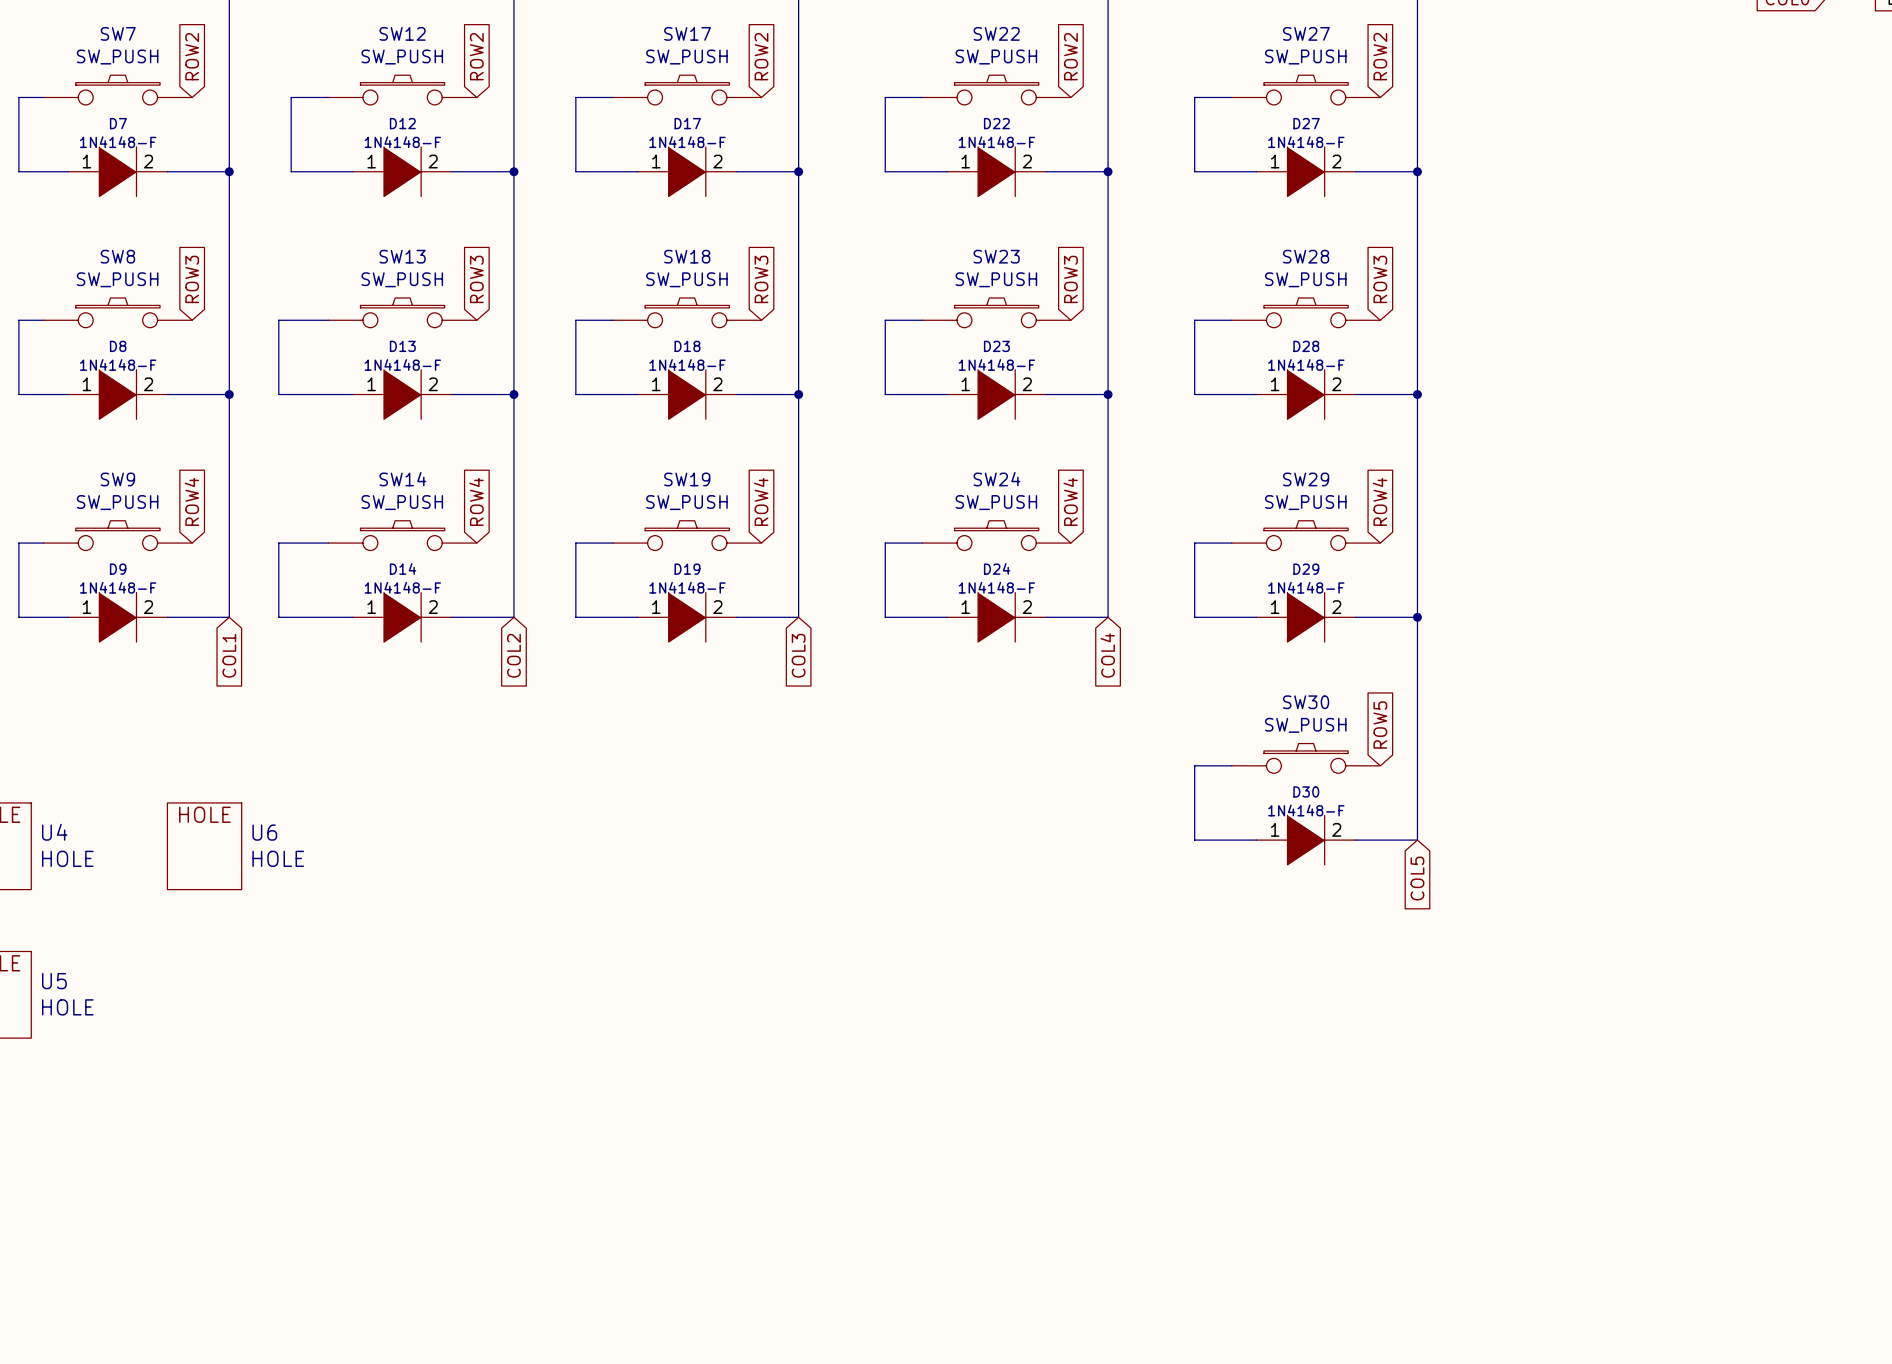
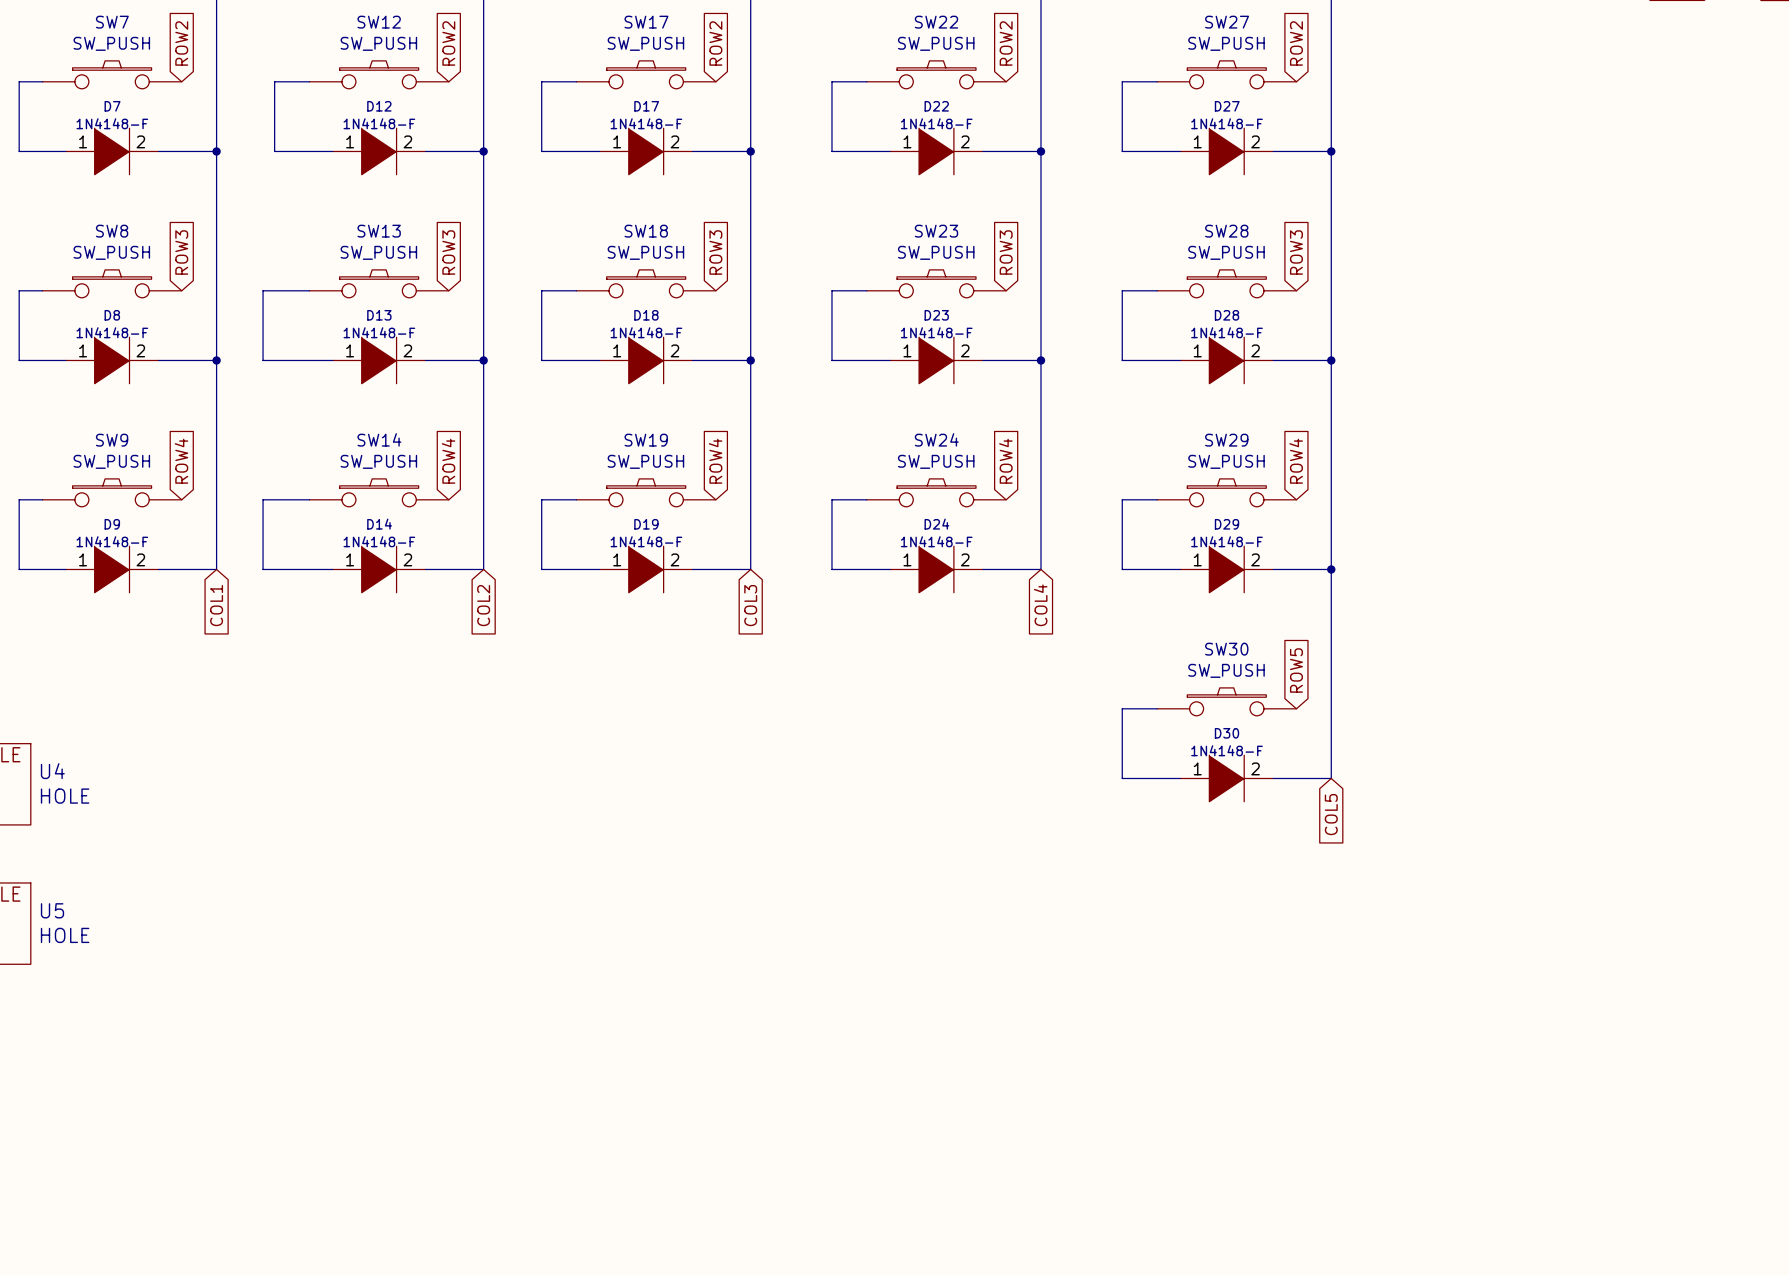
U6: HOLE (204, 846) -> none

